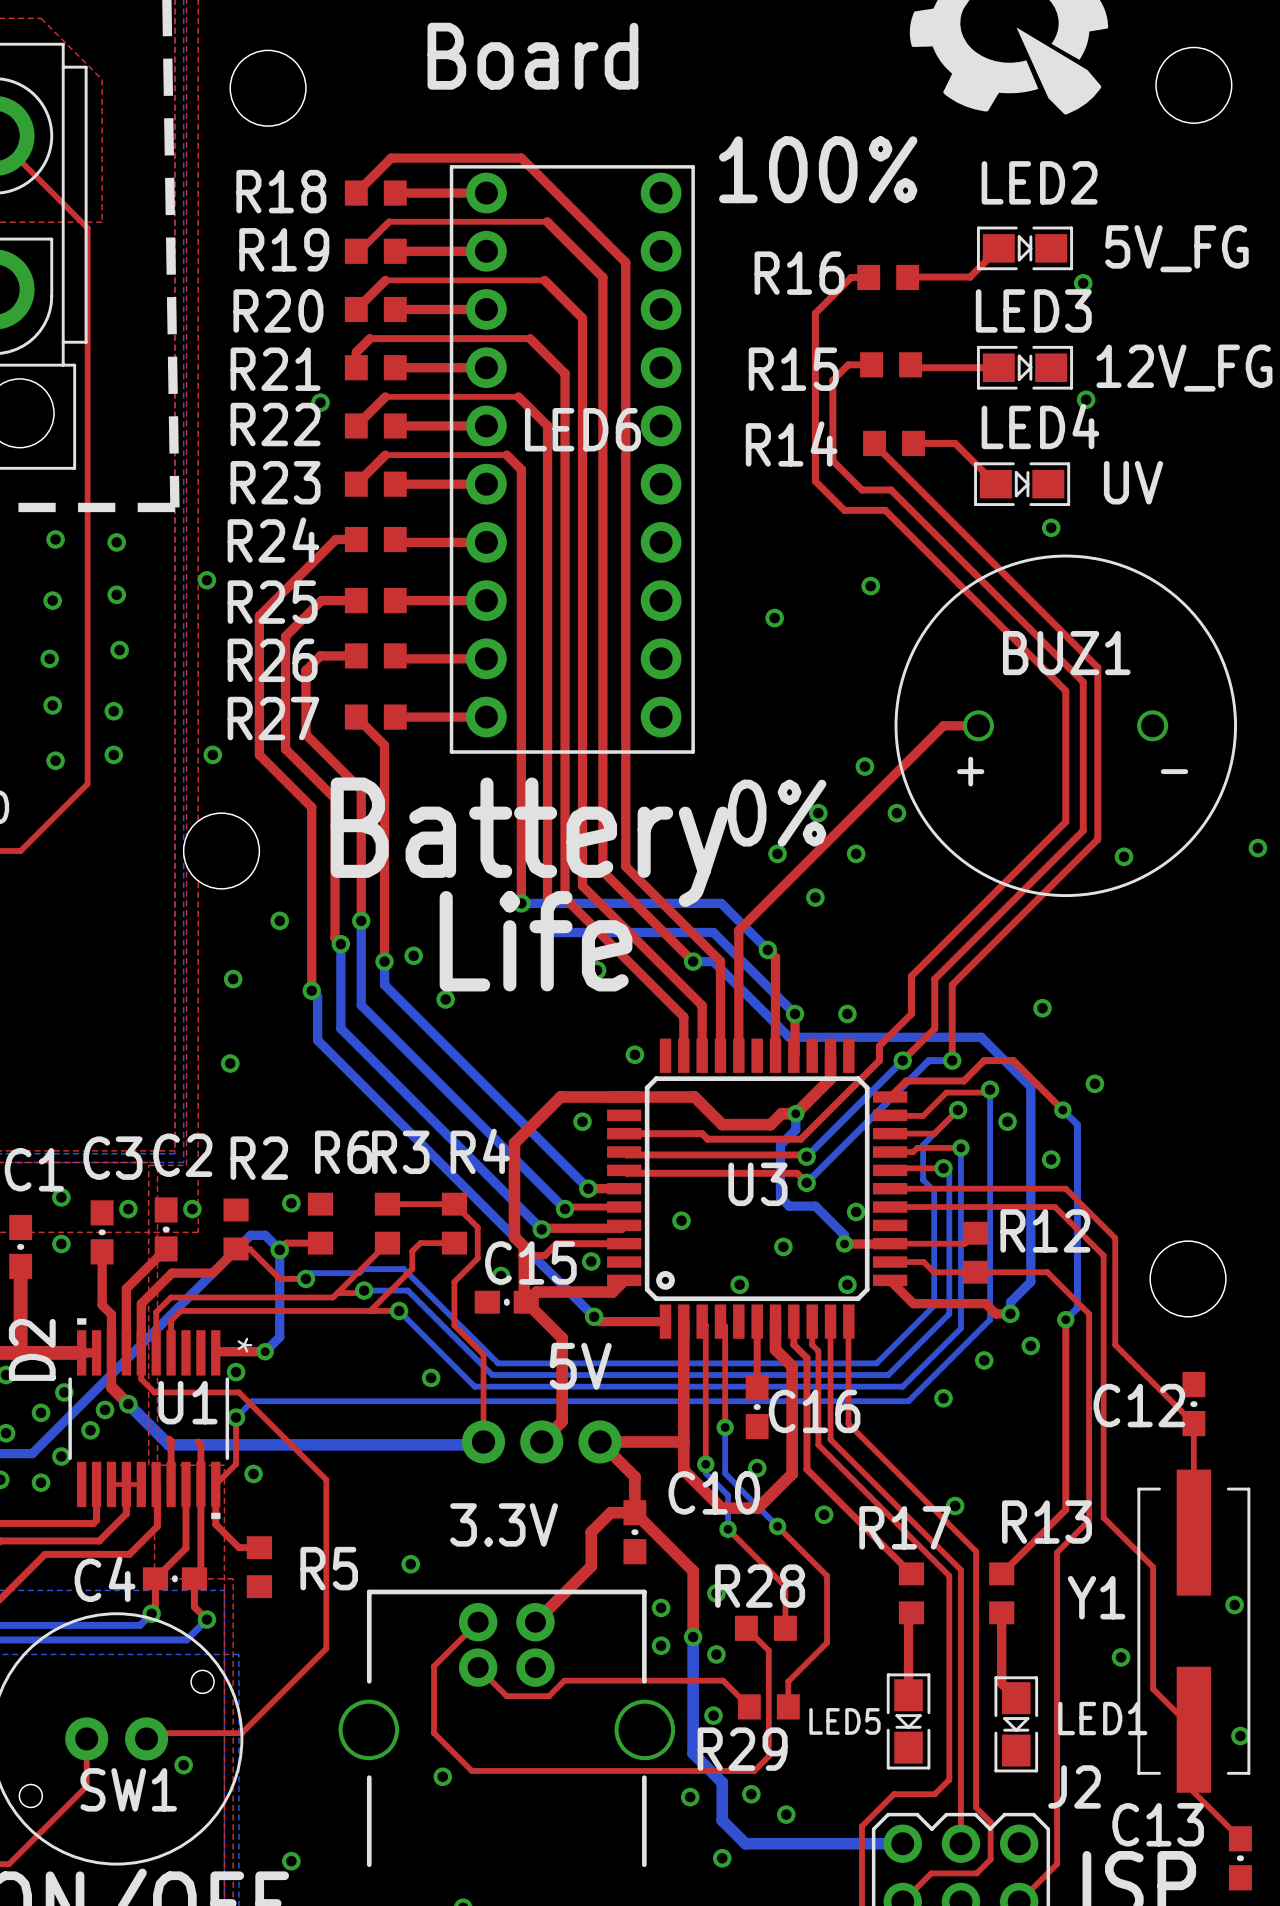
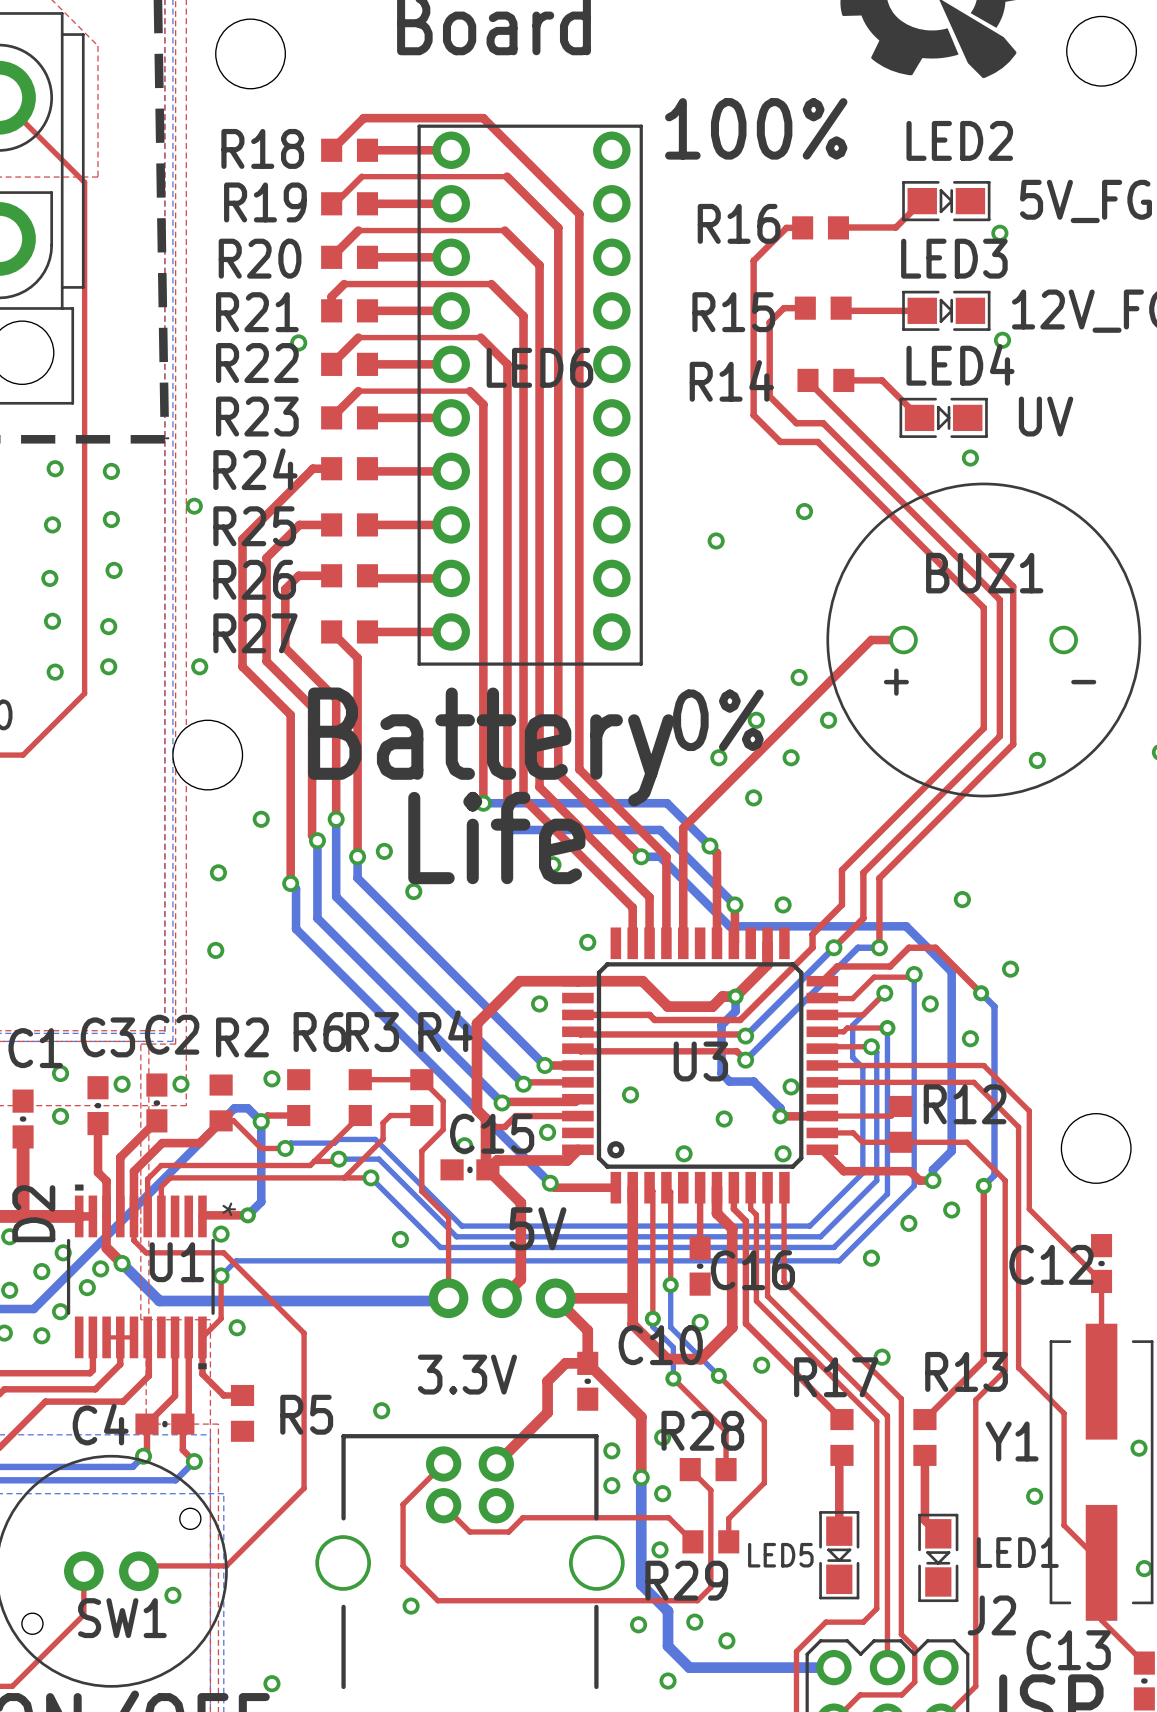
top track: (169, 1439) (171, 1441) (171, 1484) -> none
top track: (198, 1441) (200, 1444) (200, 1484) -> none

